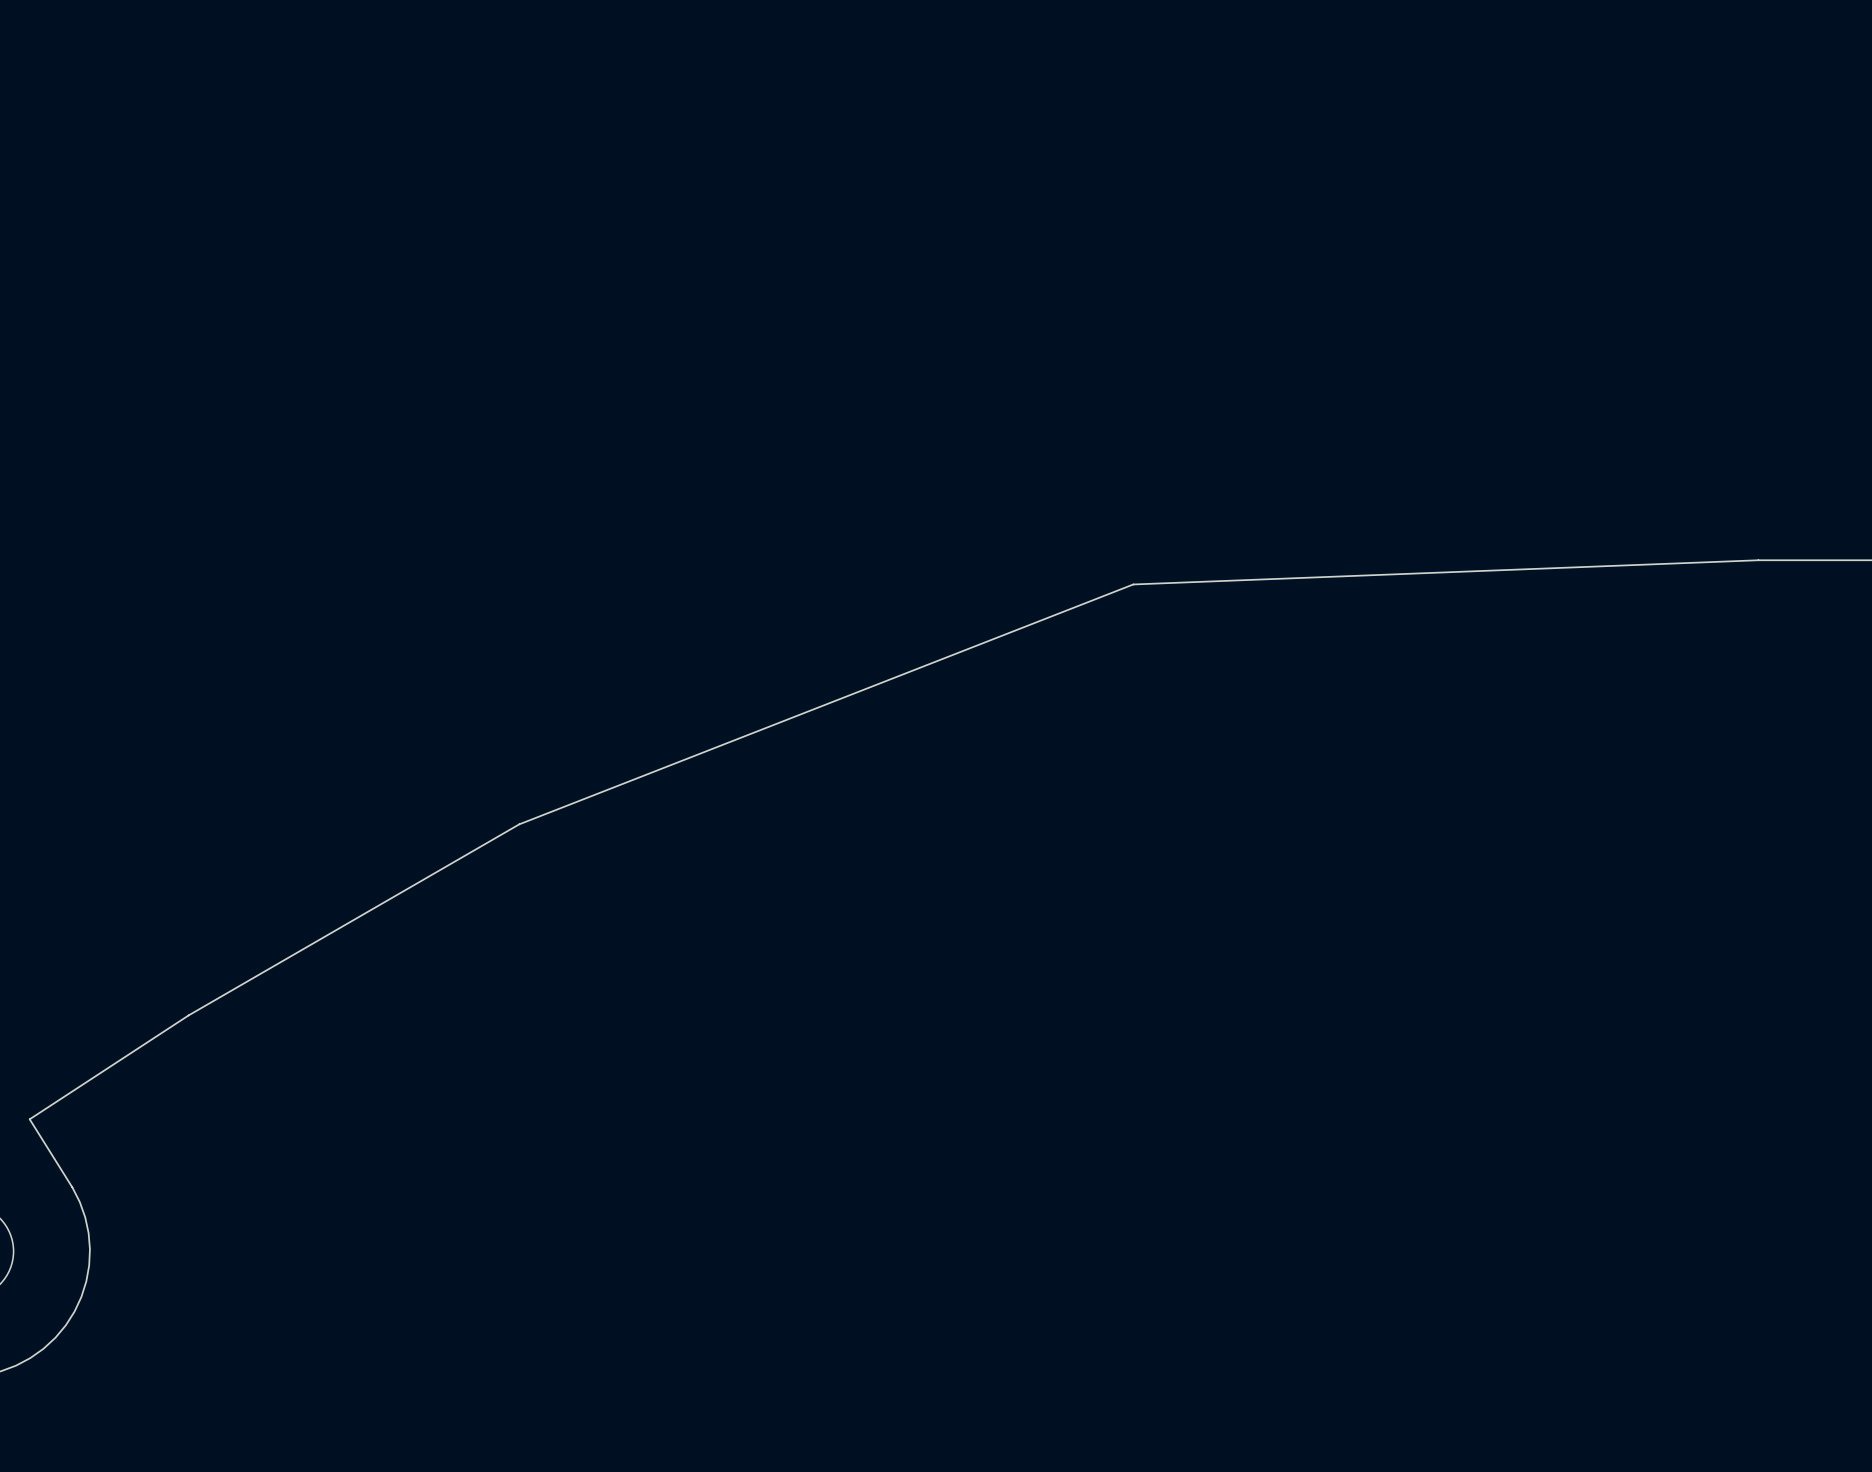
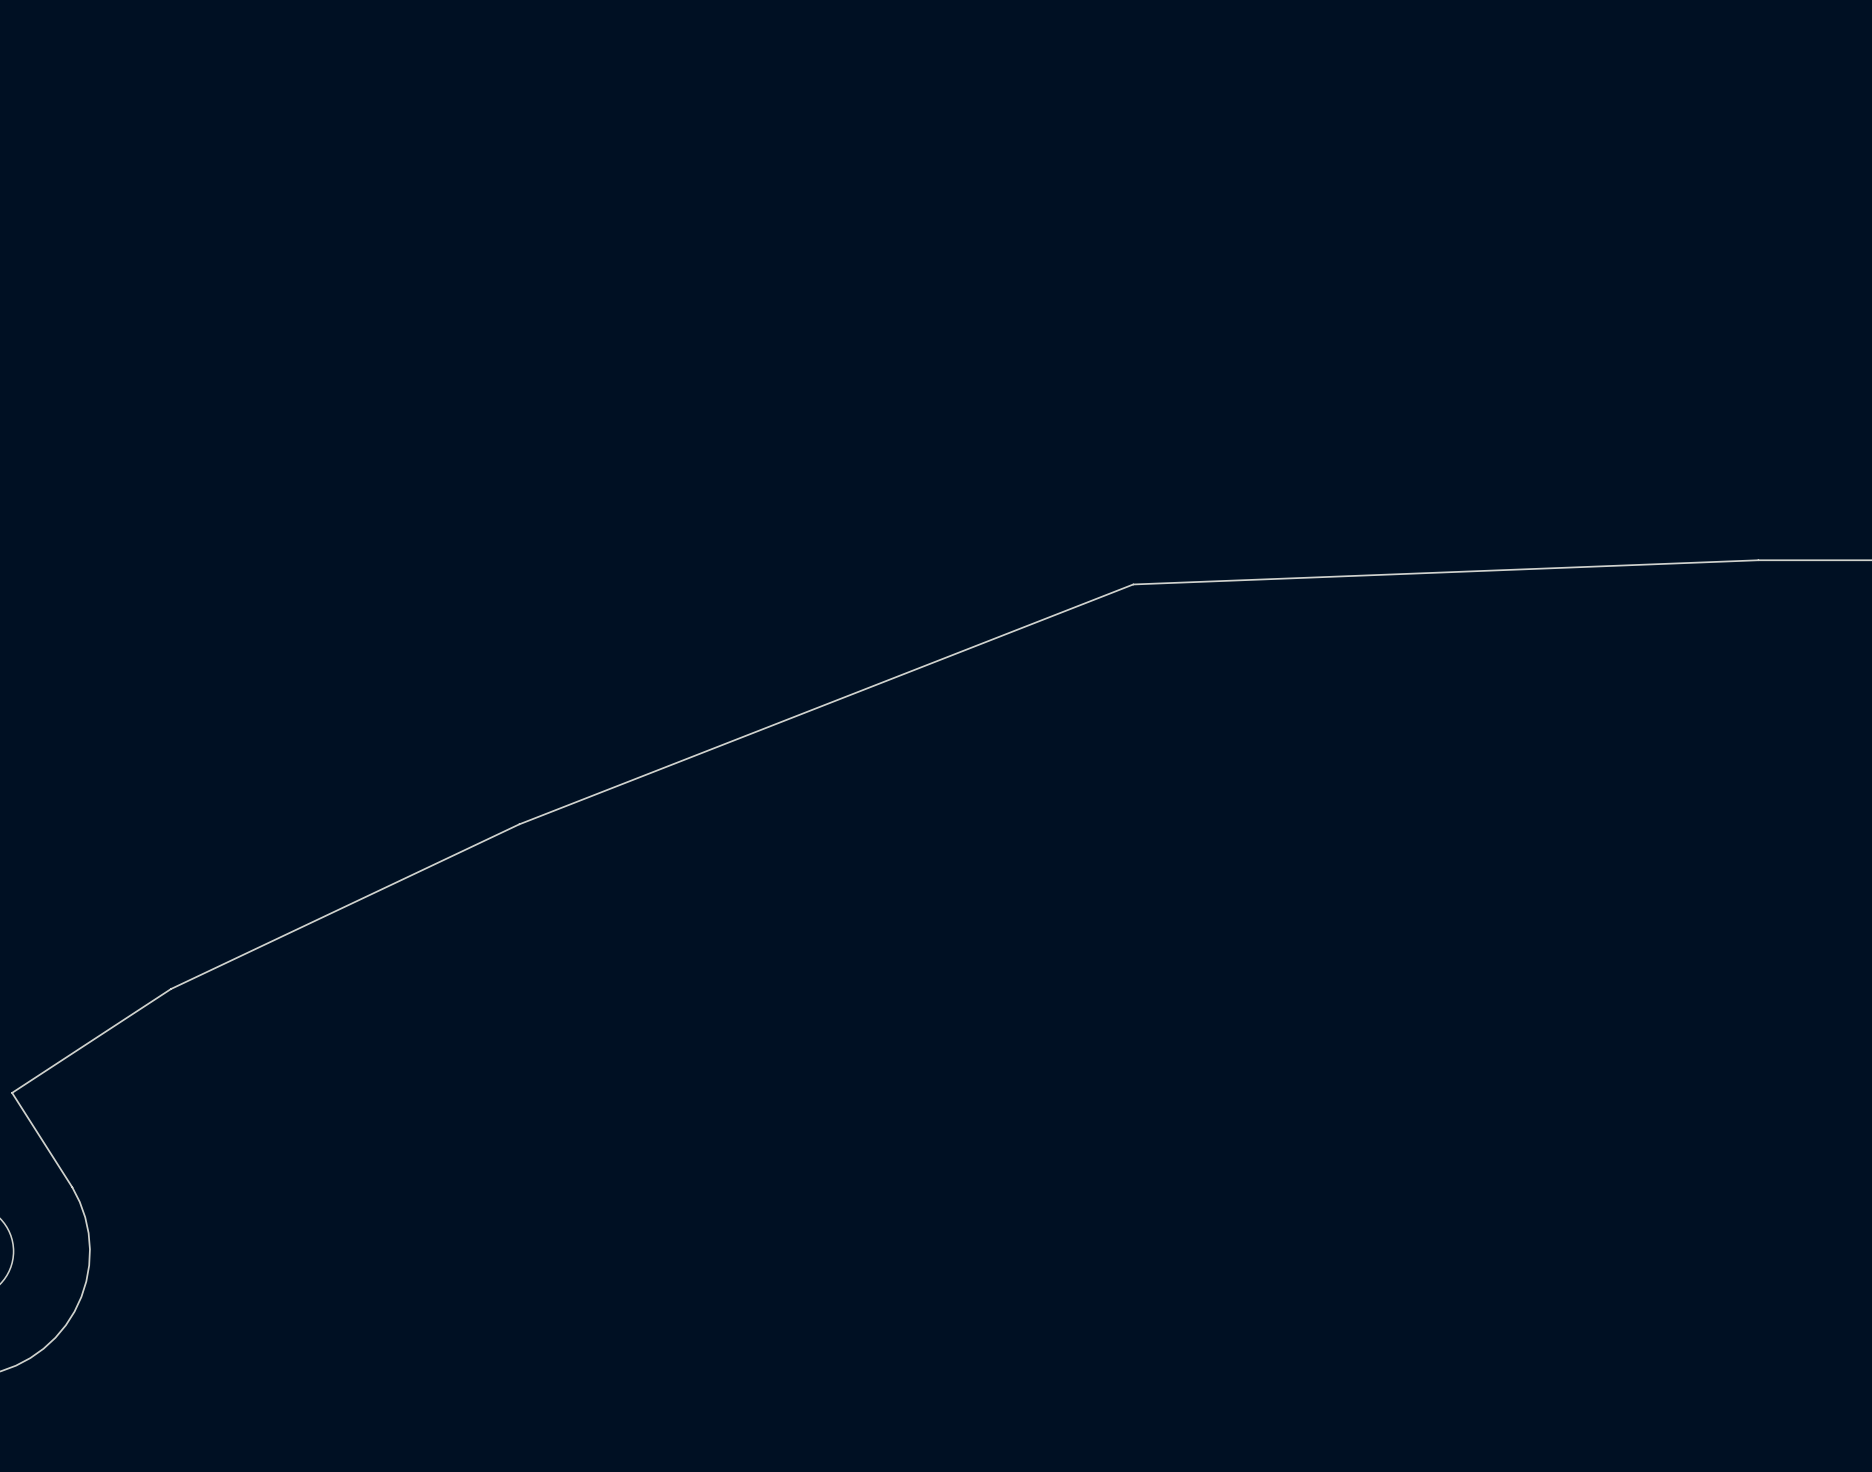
board edge: (519, 824) (188, 1015) (29, 1119) (72, 1187) -> (519, 824) (171, 989) (12, 1092) (72, 1187)

